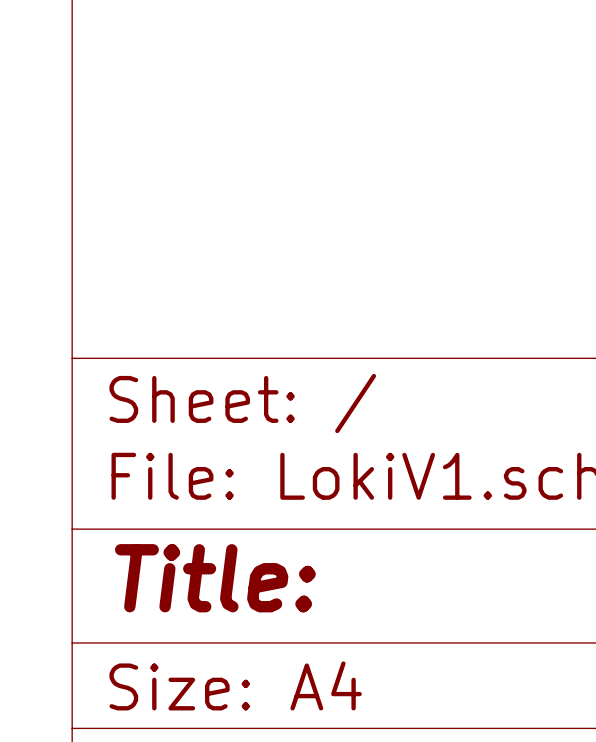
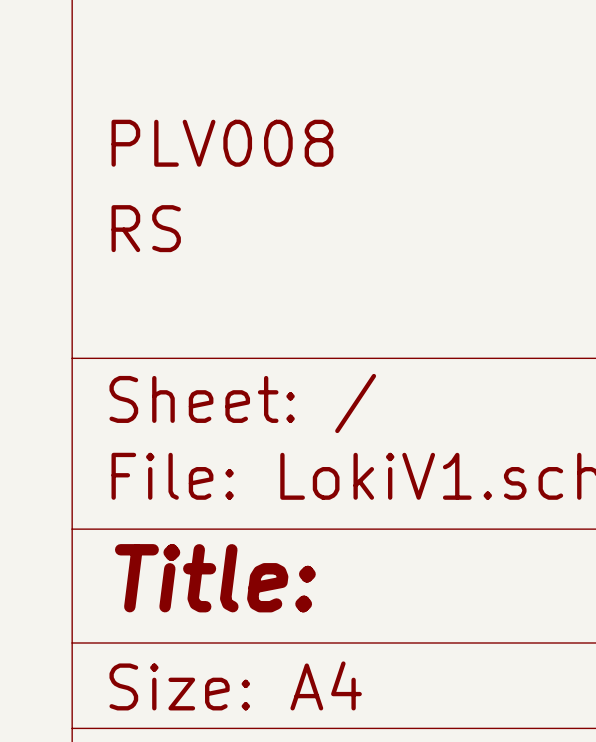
title block: none -> PLV008 (222, 143)
title block: none -> RS (146, 228)

